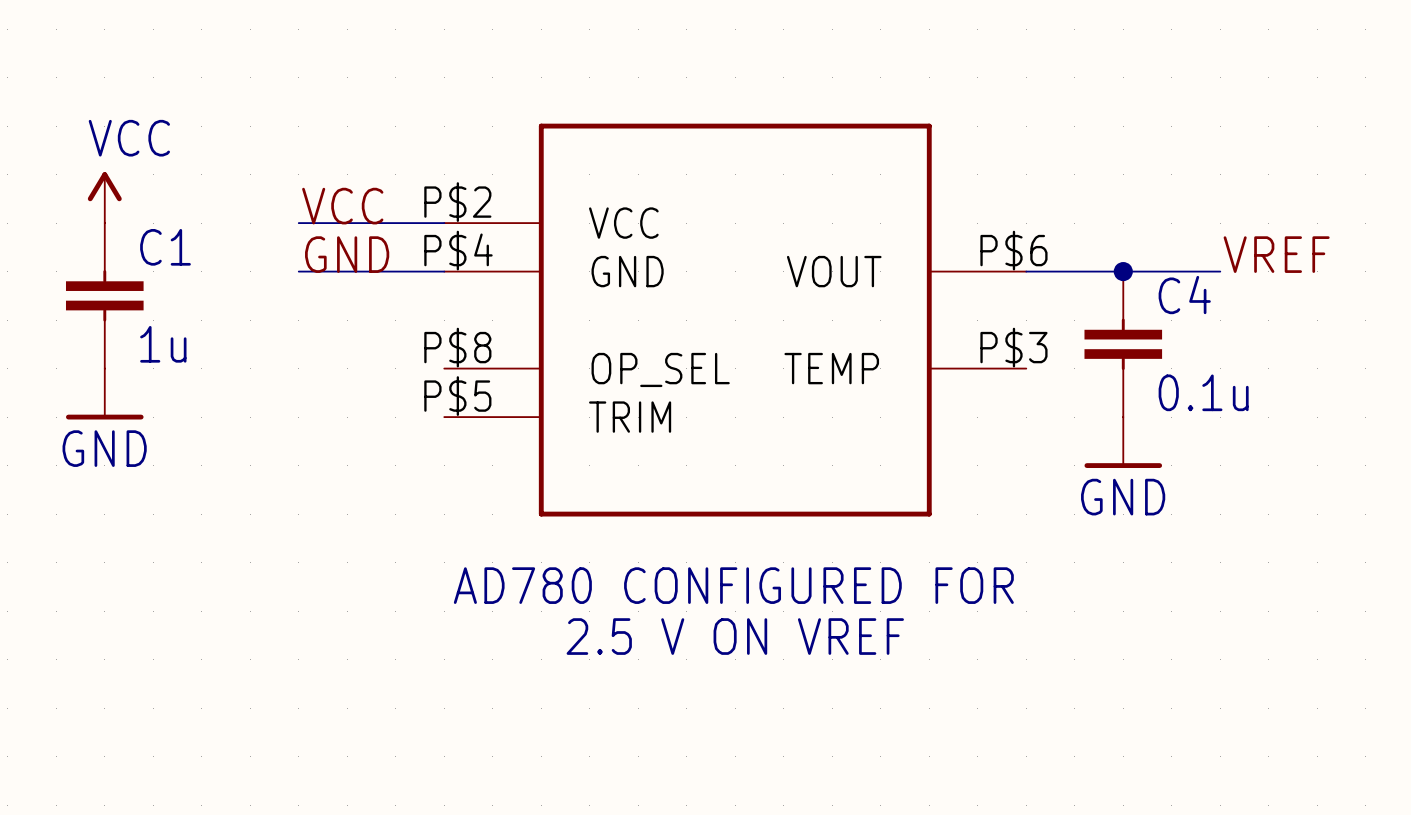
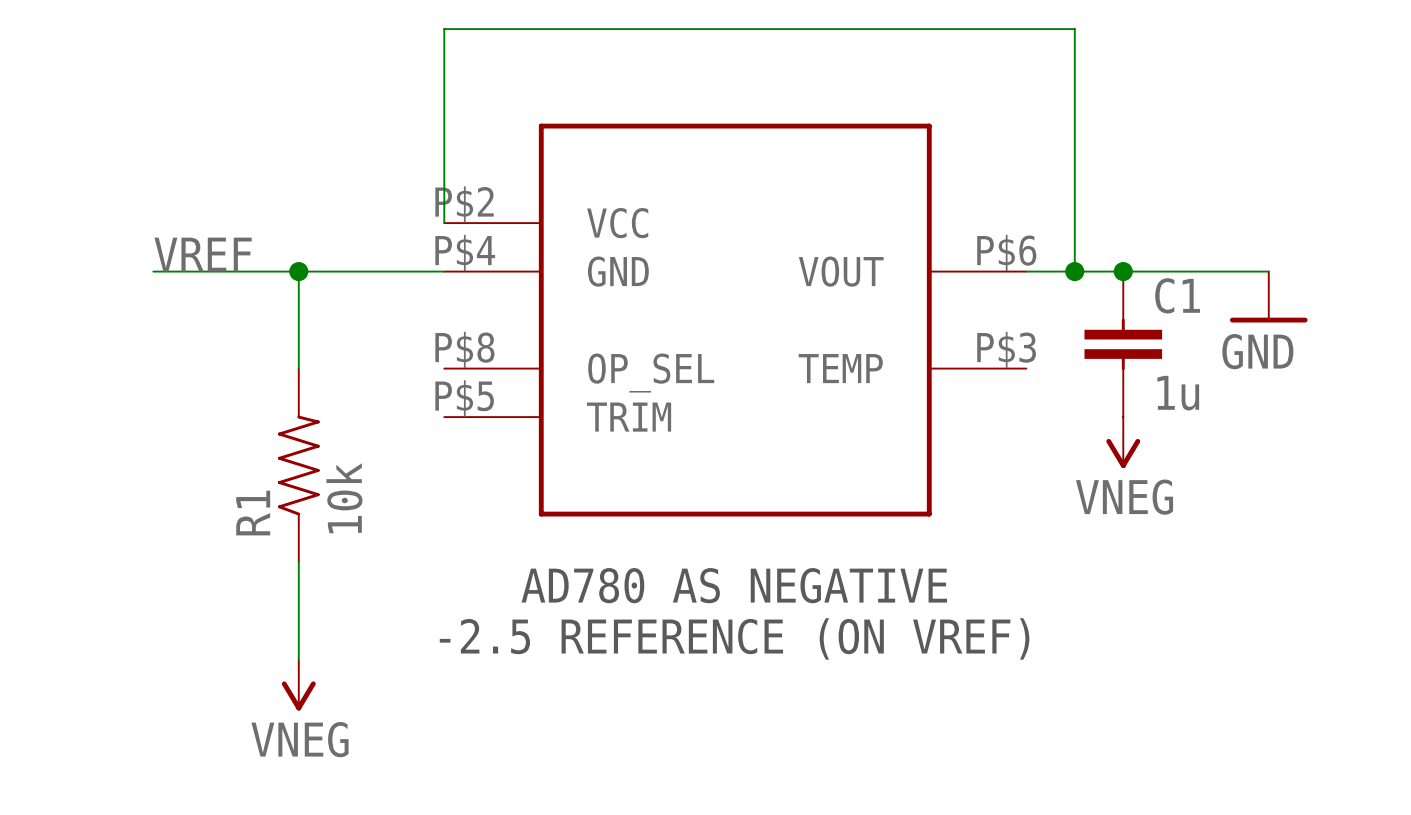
power symbol: VCC (104, 197) -> none
label: VCC (342, 206) -> none
wire: (298, 223) (444, 223) -> (1074, 271) (1074, 29) (444, 29) (444, 223)
label: none -> VREF (203, 254)
label: GND (347, 254) -> none
label: VREF (1276, 254) -> none
wire: none -> (153, 271) (298, 271) (298, 368)
junction: none -> (298, 271)
junction: none -> (1074, 271)
wire: none -> (1220, 271) (1268, 271)
C1: 1u (104, 295) -> none
C4 name: C4 (1184, 295) -> C1 (1177, 295)
power symbol: none -> GND (1268, 297)
C4 value: 0.1u (1203, 392) -> 1u (1178, 393)
power symbol: GND (104, 394) -> none
power symbol: GND (1123, 442) -> VNEG (1123, 442)
R1: none -> 10k (298, 465)
wire: none -> (298, 562) (298, 659)
text: AD780 CONFIGURED FOR (733, 585) -> AD780 AS NEGATIVE (734, 585)
text: 2.5 V ON VREF (735, 636) -> -2.5 REFERENCE (ON VREF) (734, 638)
power symbol: none -> VNEG (298, 685)

